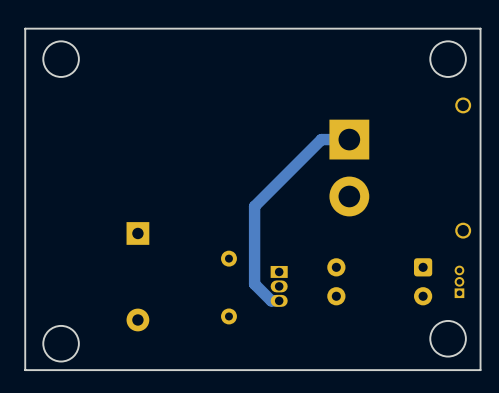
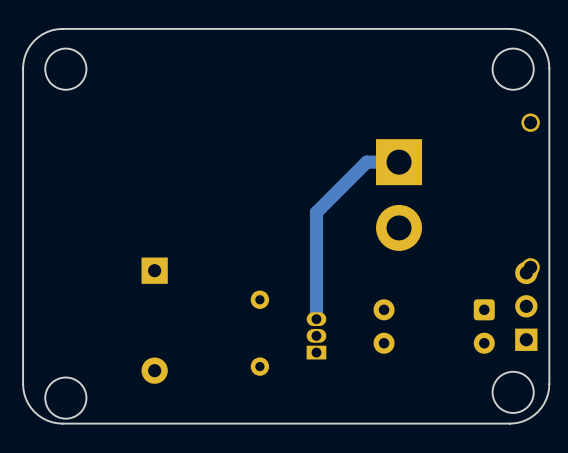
board edge: (480, 28) (25, 28) (25, 370) (480, 370) (480, 28) -> (509, 28) (524, 31) (537, 40) (546, 53) (549, 68) (549, 384) (544, 403) (533, 415) (524, 420) (509, 423) (62, 423) (47, 420) (31, 408) (26, 399) (23, 384) (23, 68) (28, 48) (38, 37) (52, 30) (62, 28) (509, 28)
track: (277, 183) (254, 206) (254, 284) (271, 300) (279, 300) -> (316, 212) (316, 319)
part: none -> (526, 306)
part: (459, 281) -> none
part rotation: 0° (279, 286) -> 180° (316, 335)

